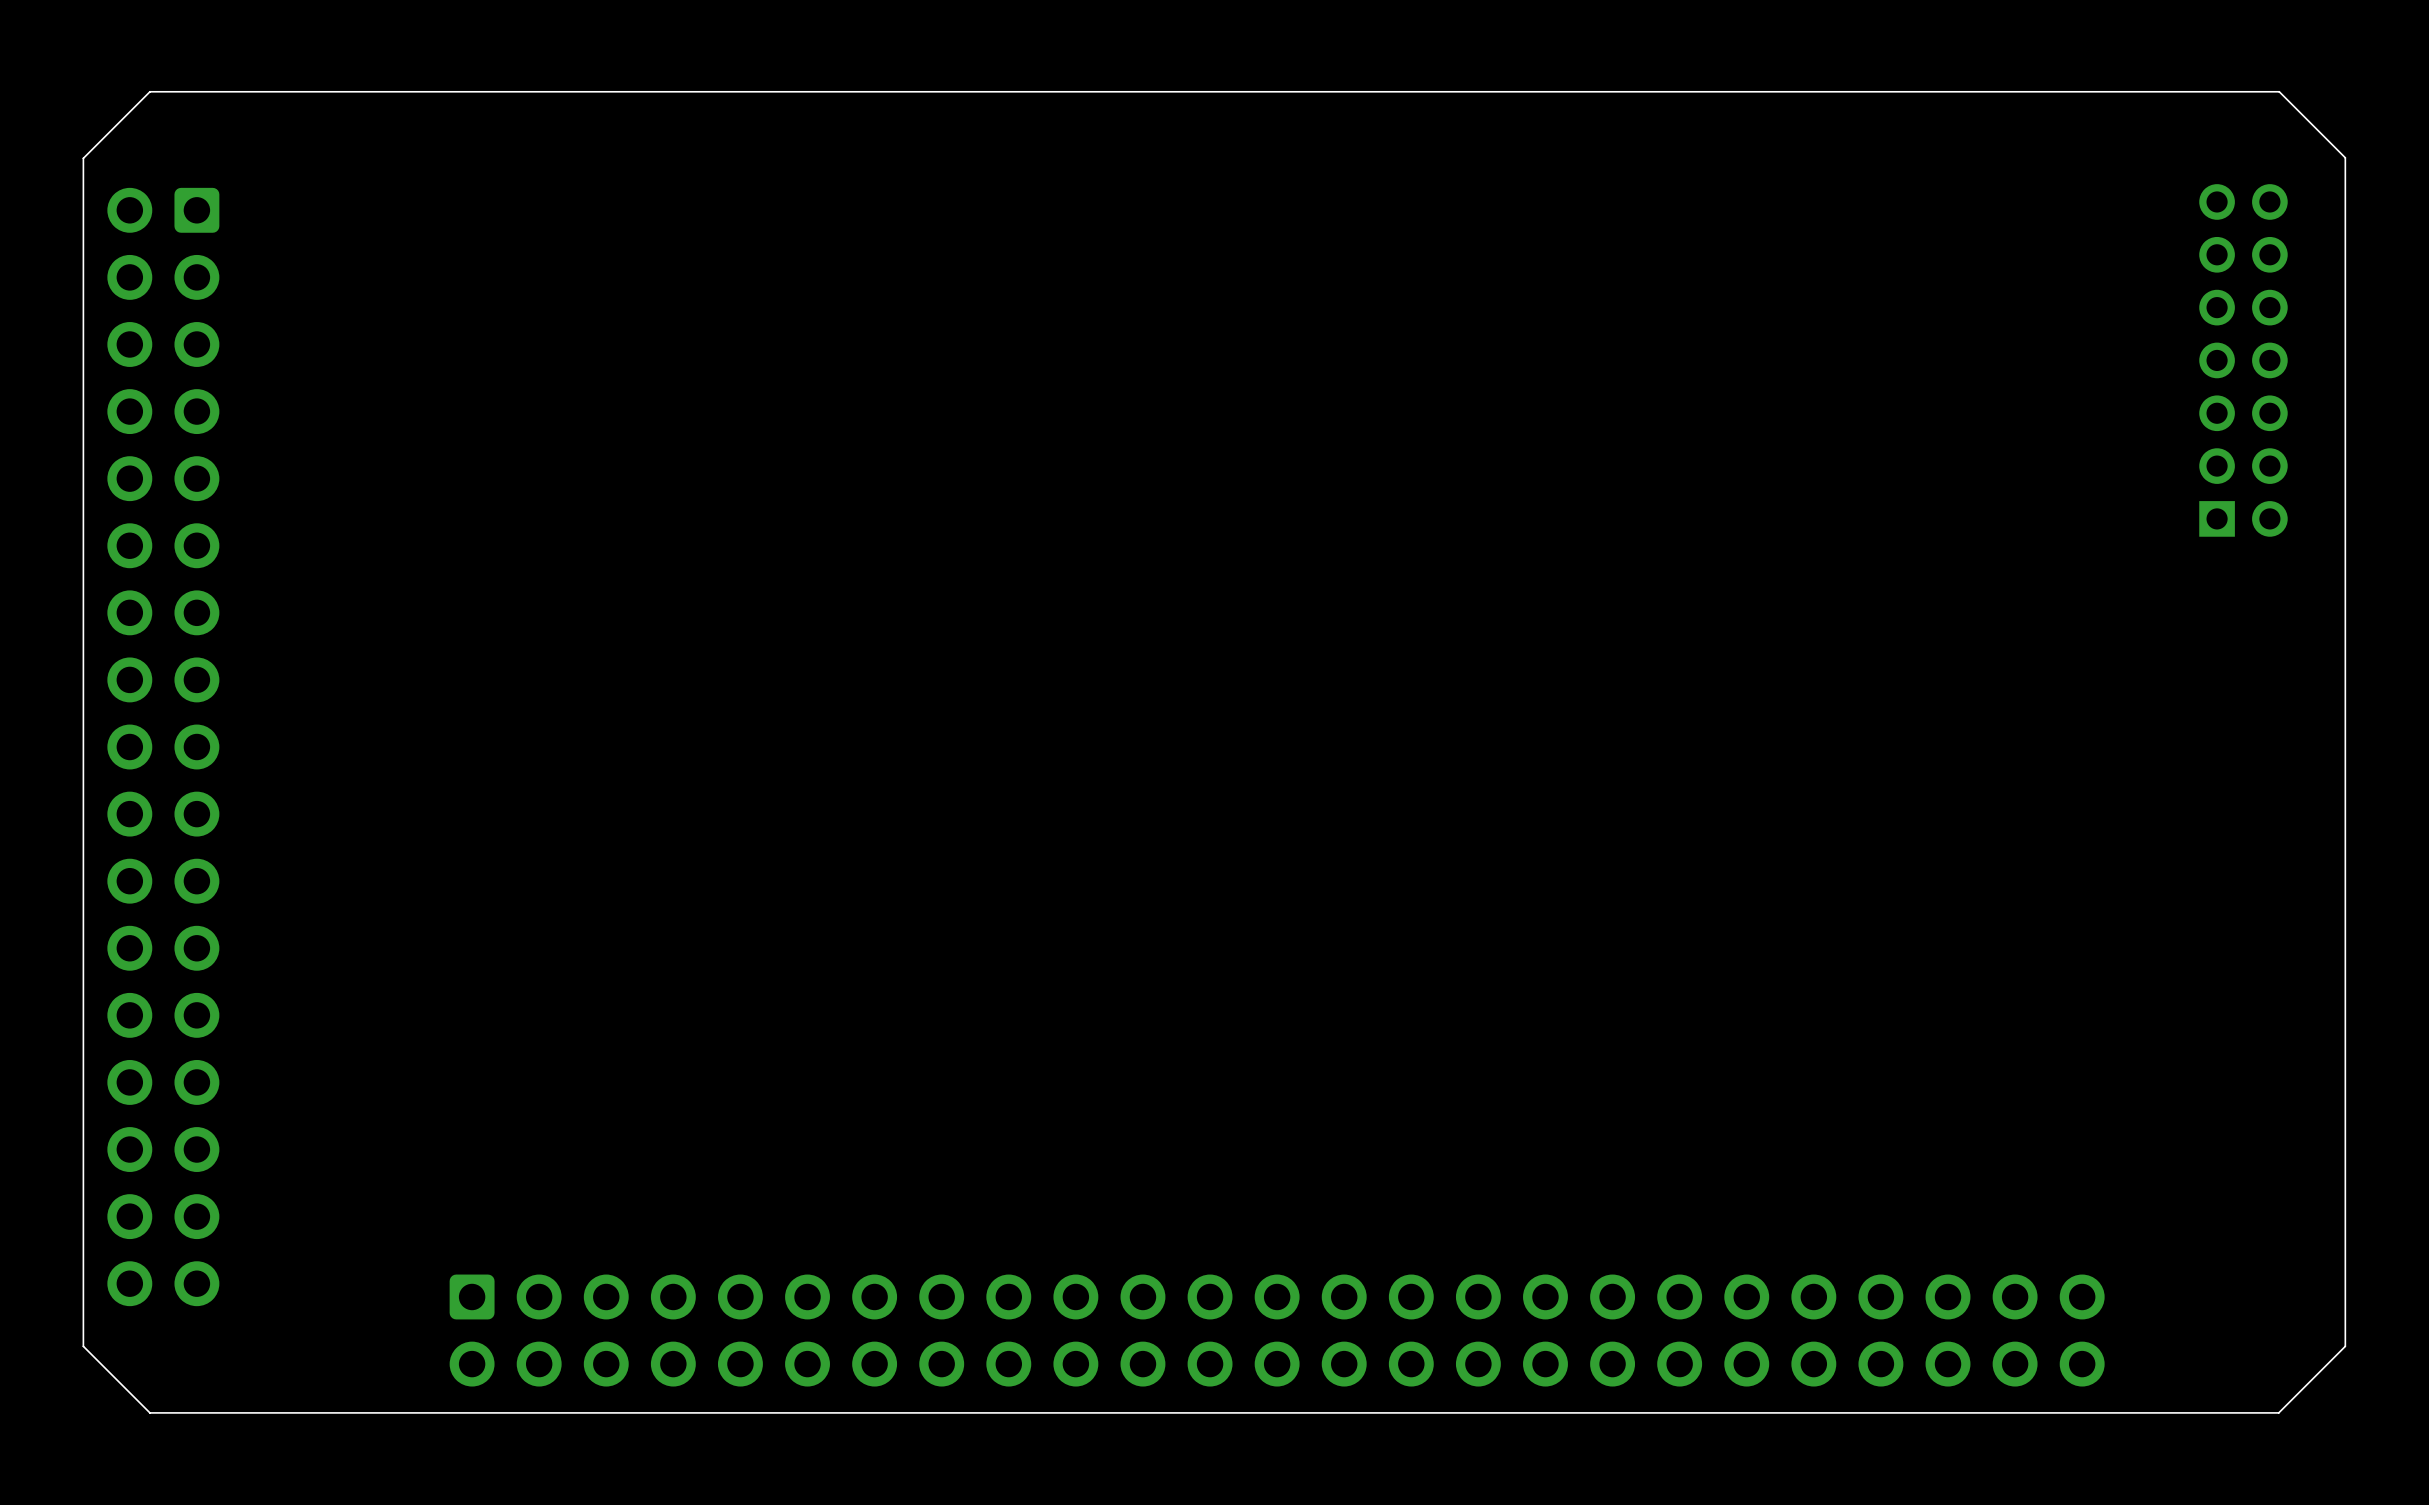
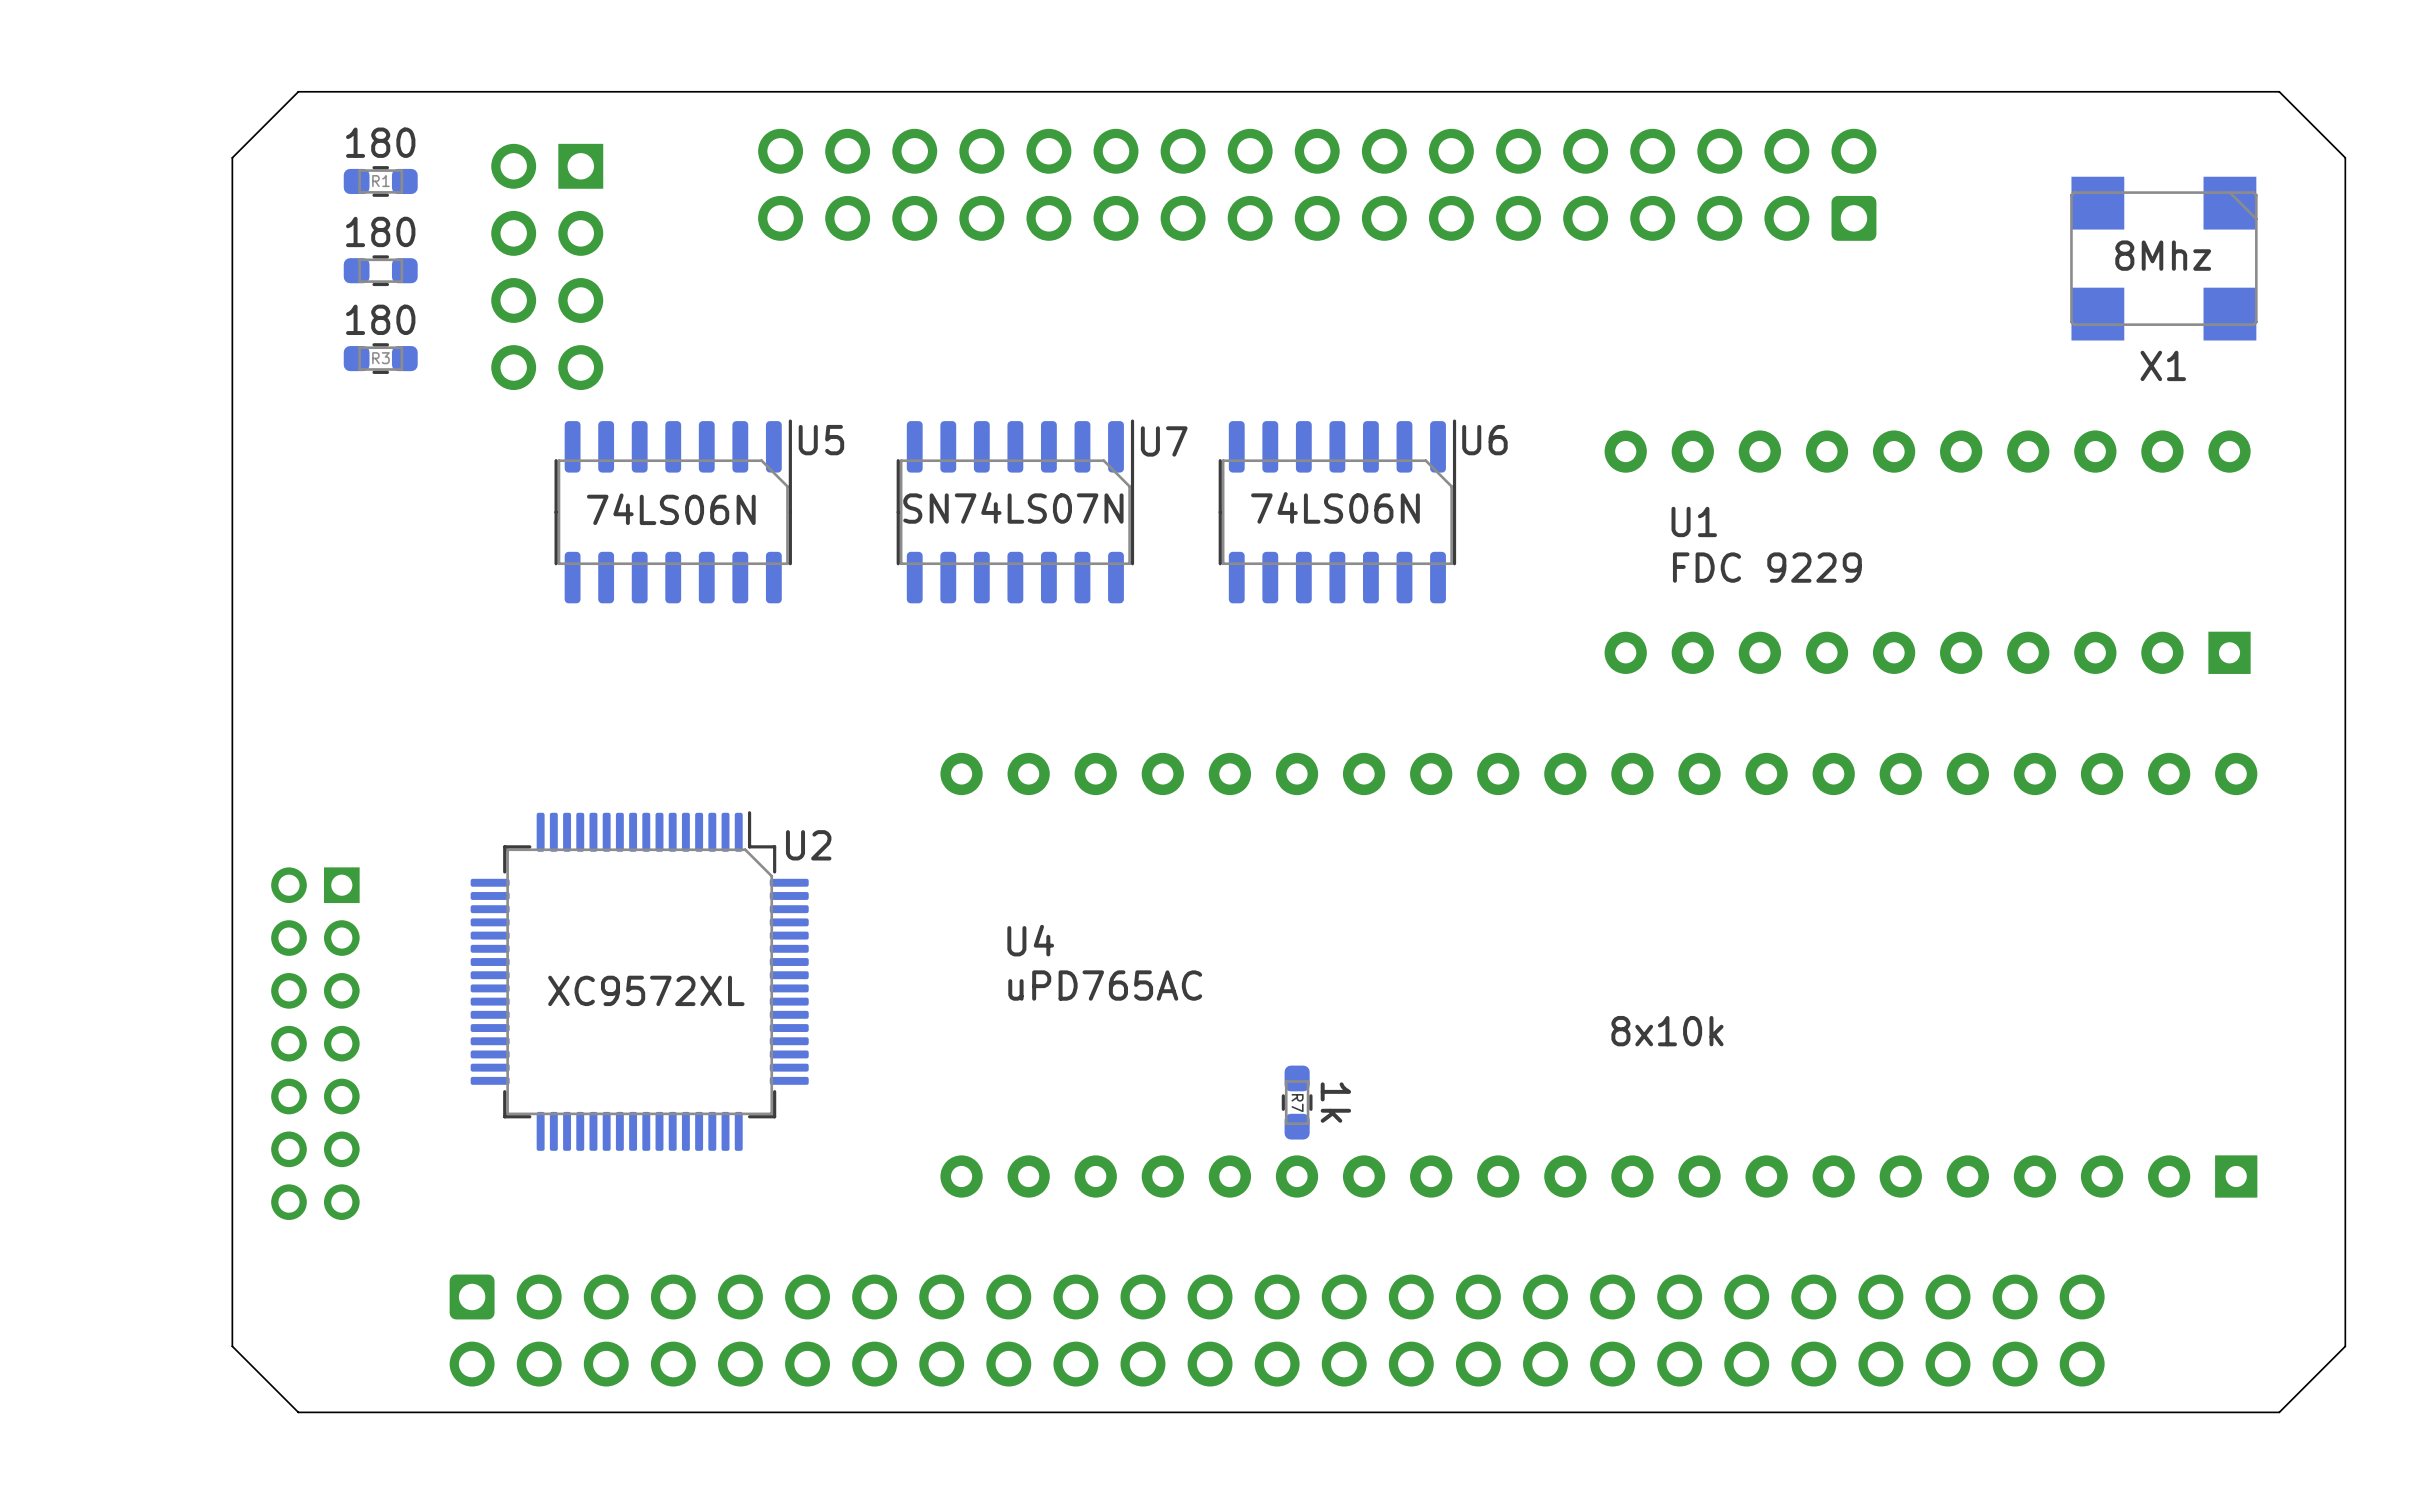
board edge: (298, 91) (149, 91) (83, 158) (83, 1346) (149, 1412) (2279, 1412) -> (298, 91) (232, 157) (232, 1346) (298, 1412) (2279, 1412)
R1: none -> 180 (380, 181)
part: none -> (1317, 184)
X1: none -> 8Mhz (2163, 258)
part: none -> (547, 266)
part: none -> 180 (380, 270)
R3: none -> 180 (380, 358)
part: (2243, 360) -> none
U5: none -> 74LS06N (673, 511)
U7: none -> SN74LS07N (1015, 511)
U6: none -> 74LS06N (1337, 511)
U1: none -> FDC 9229 (1927, 552)
part: (163, 747) -> none
U4: none -> uPD765AC (1598, 975)
U2: none -> XC9572XL (639, 981)
text: none -> 8x10k (1667, 1031)
part: none -> (315, 1043)
R7: none -> 1k (1297, 1102)

